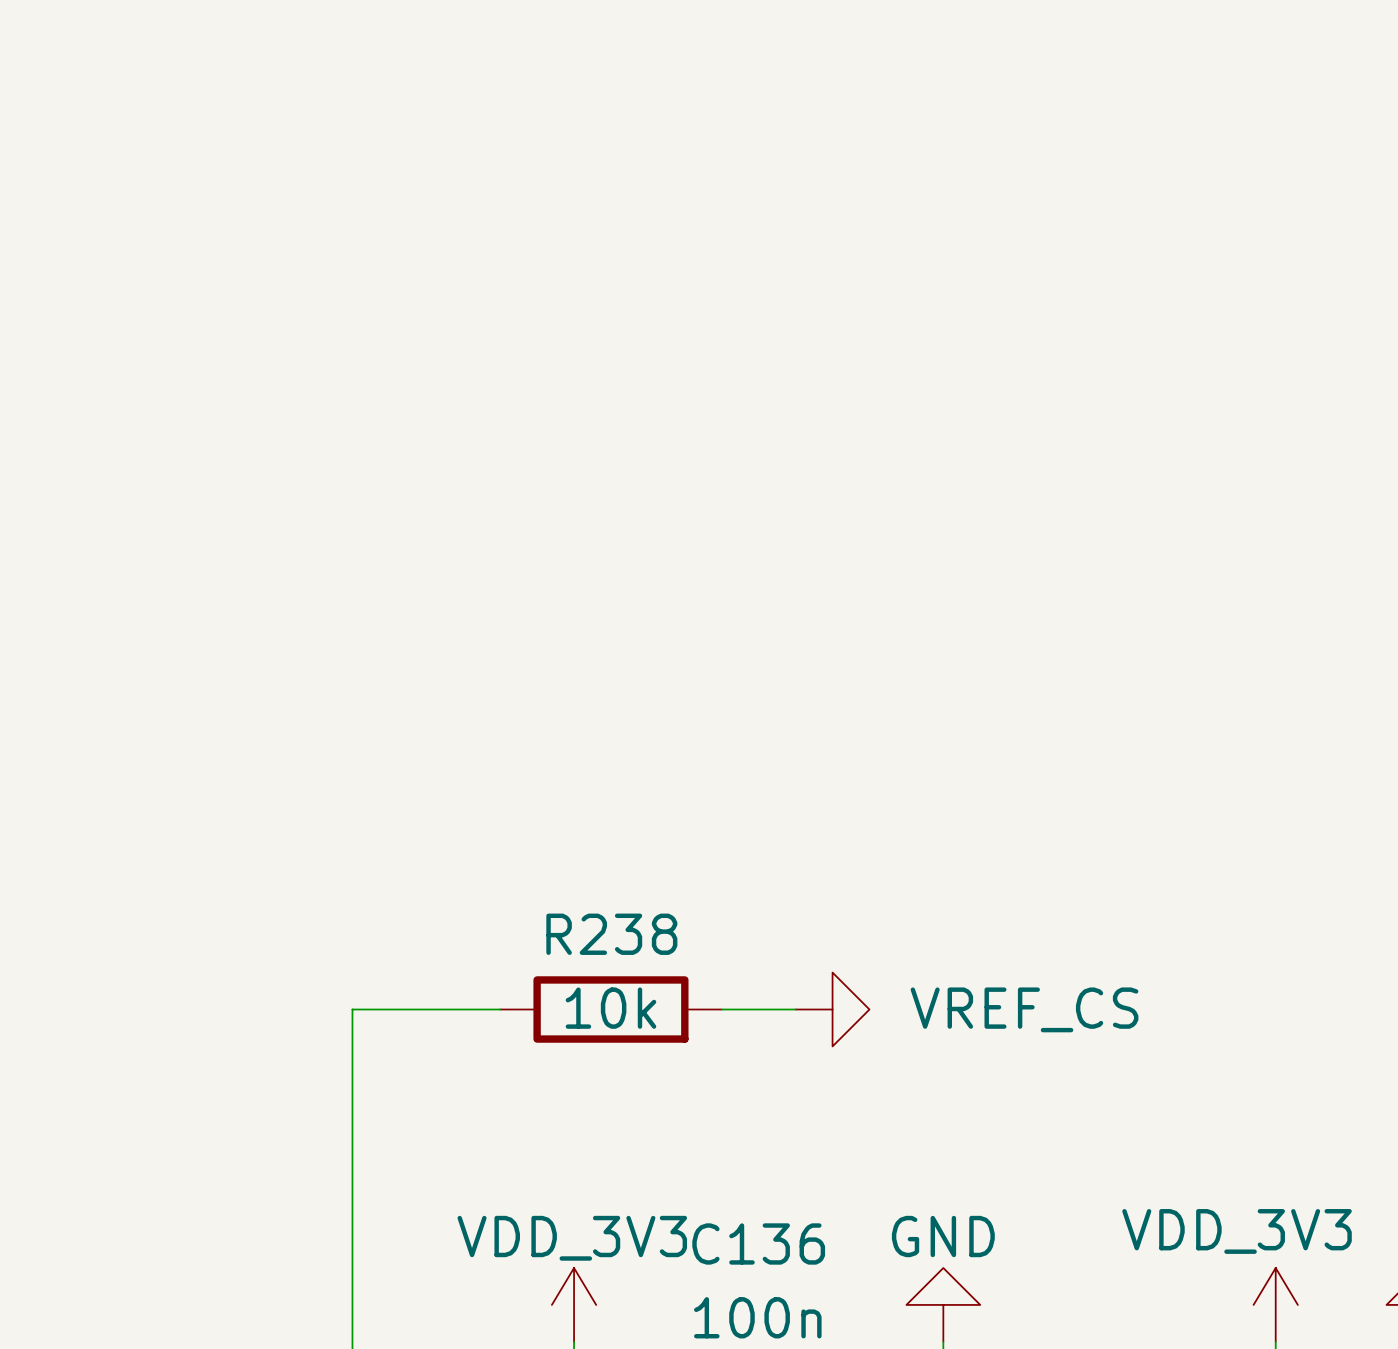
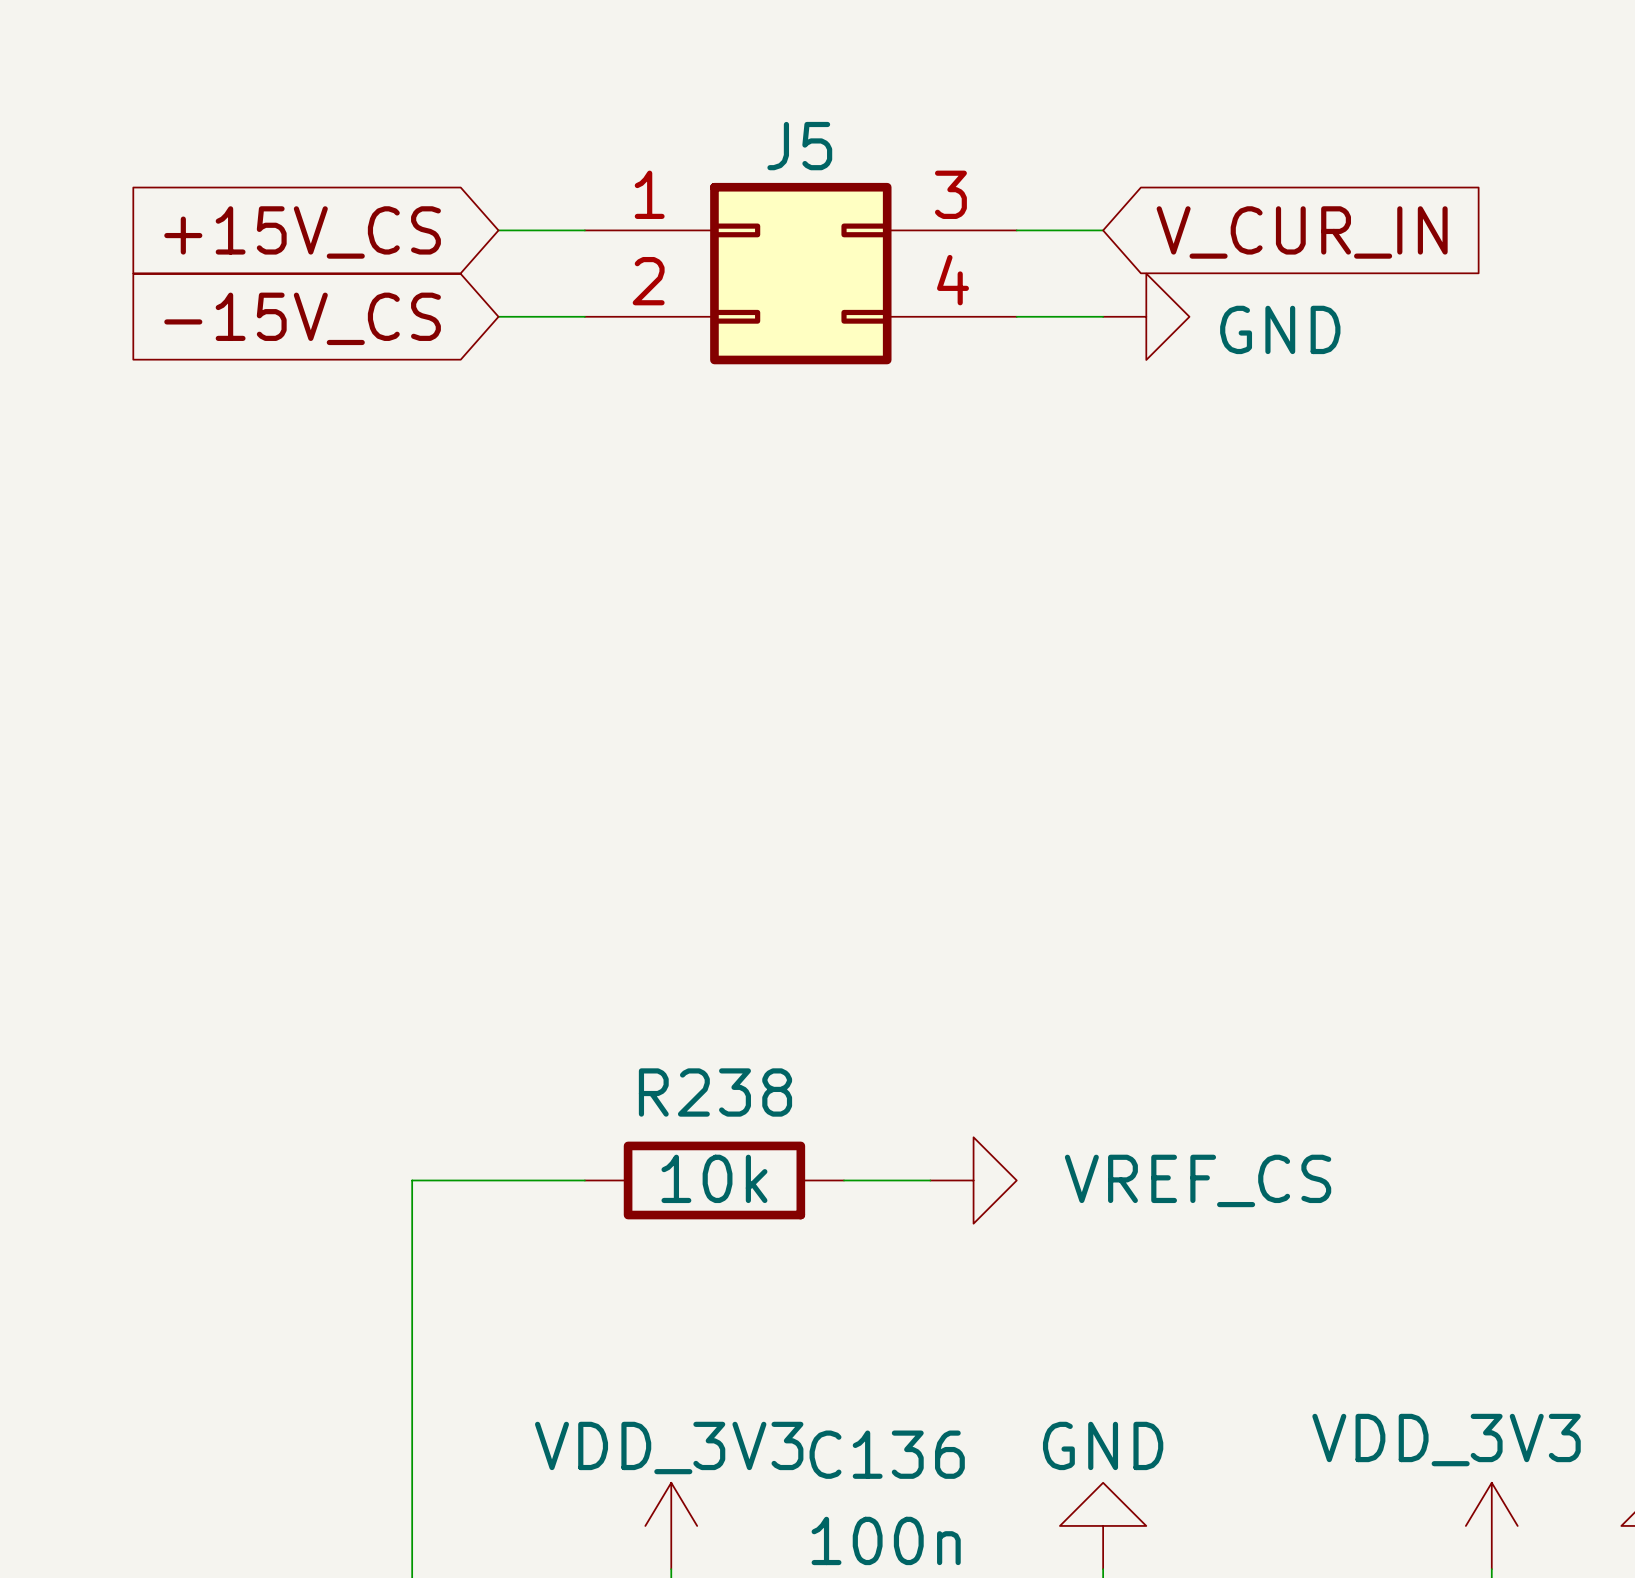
wire: none -> (498, 230) (584, 230)
wire: none -> (1016, 230) (1103, 230)
global label: none -> +15V_CS (302, 232)
global label: none -> V_CUR_IN (1302, 232)
J5: none -> (800, 273)
wire: none -> (498, 316) (584, 316)
wire: none -> (1016, 316) (1103, 316)
power symbol: none -> GND (1146, 316)
global label: none -> -15V_CS (302, 318)

